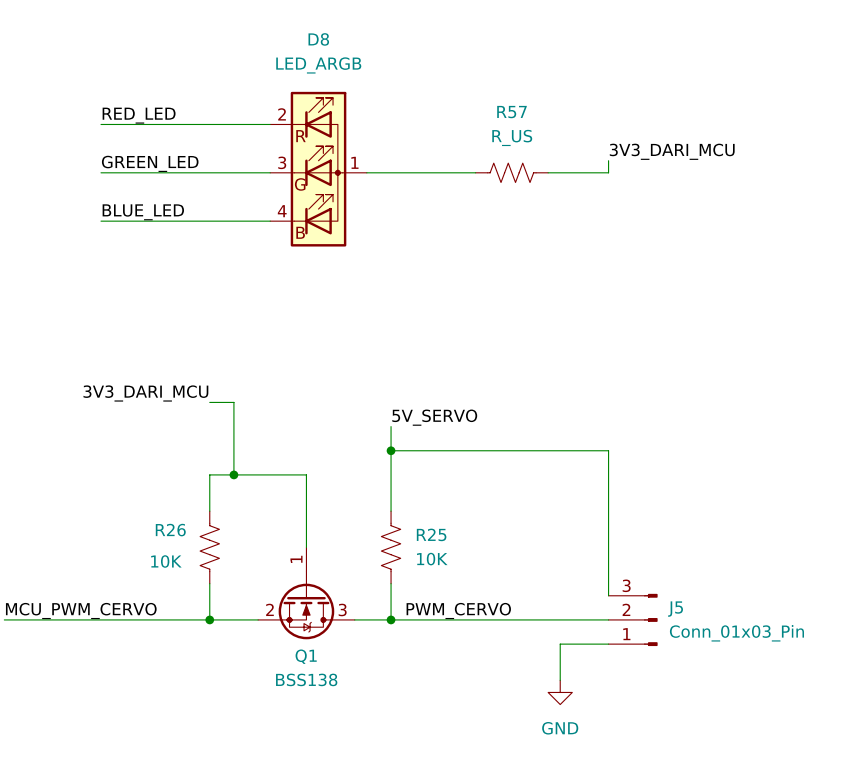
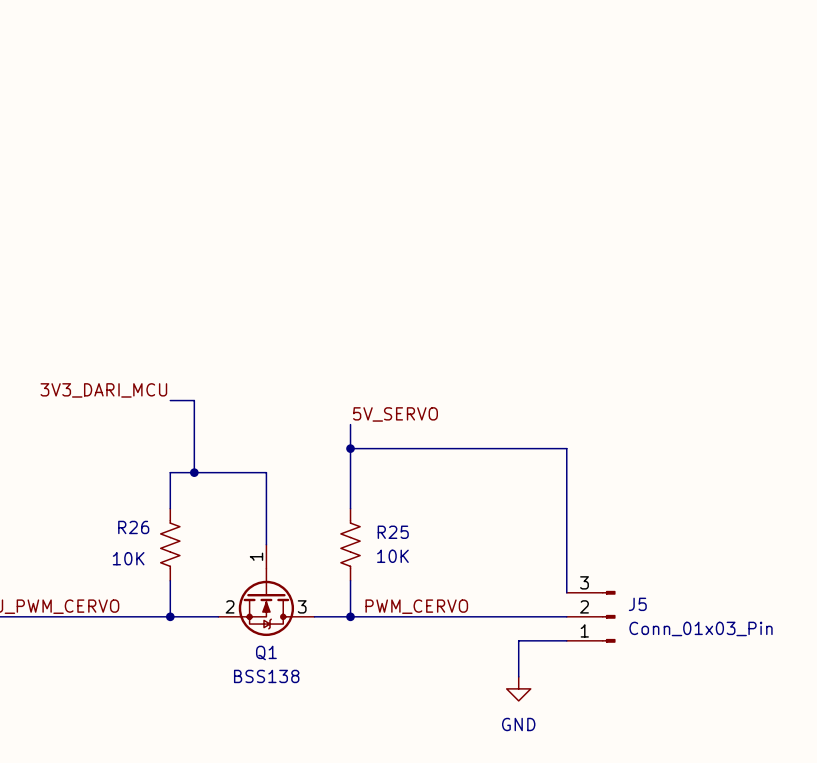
label: RED_LED (139, 115) -> none
wire: (101, 124) (270, 124) -> none
label: 3V3_DARI_MCU (672, 151) -> none
wire: (608, 160) (608, 172) (548, 172) -> none
label: GREEN_LED (150, 163) -> none
D8: LED_ARGB (318, 169) -> none
wire: (101, 172) (270, 172) -> none
wire: (366, 172) (475, 172) -> none
R57: R_US (511, 172) -> none
label: BLUE_LED (143, 212) -> none
wire: (101, 221) (270, 221) -> none

